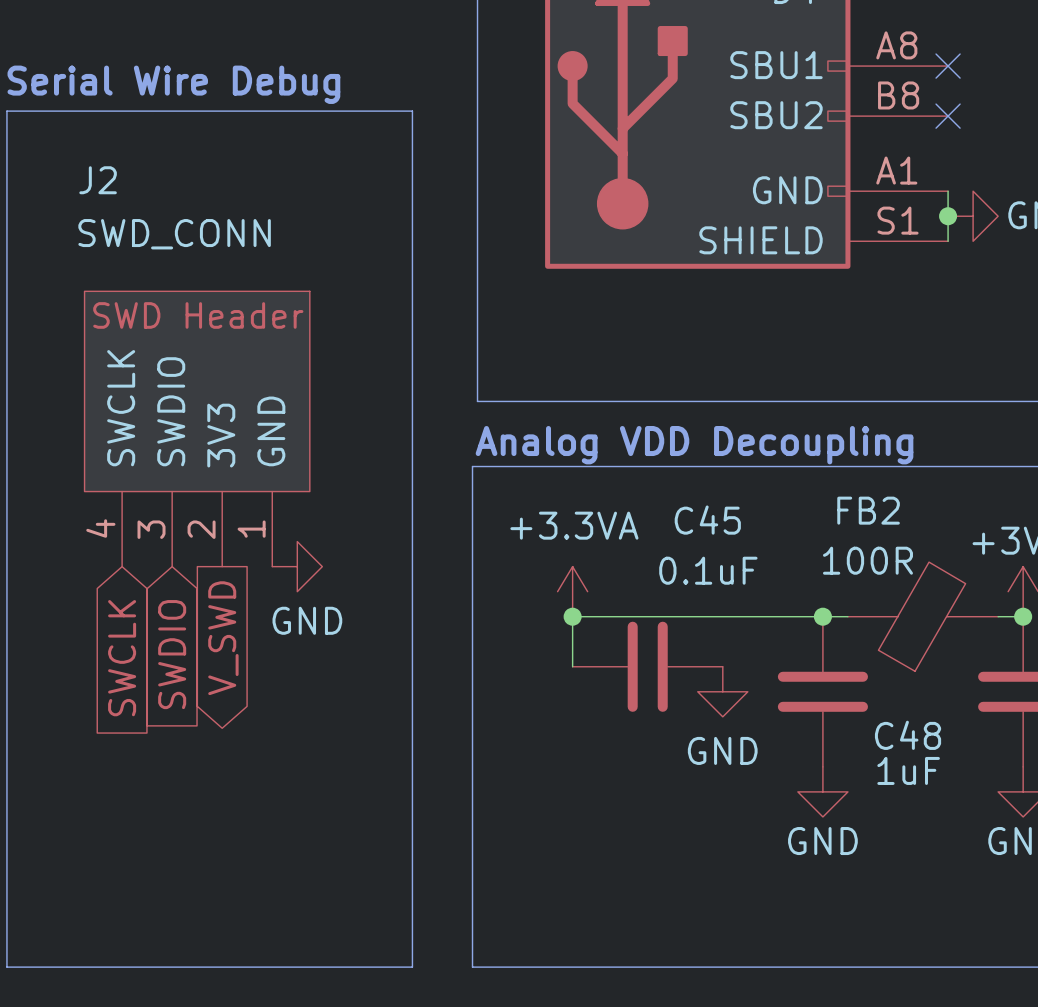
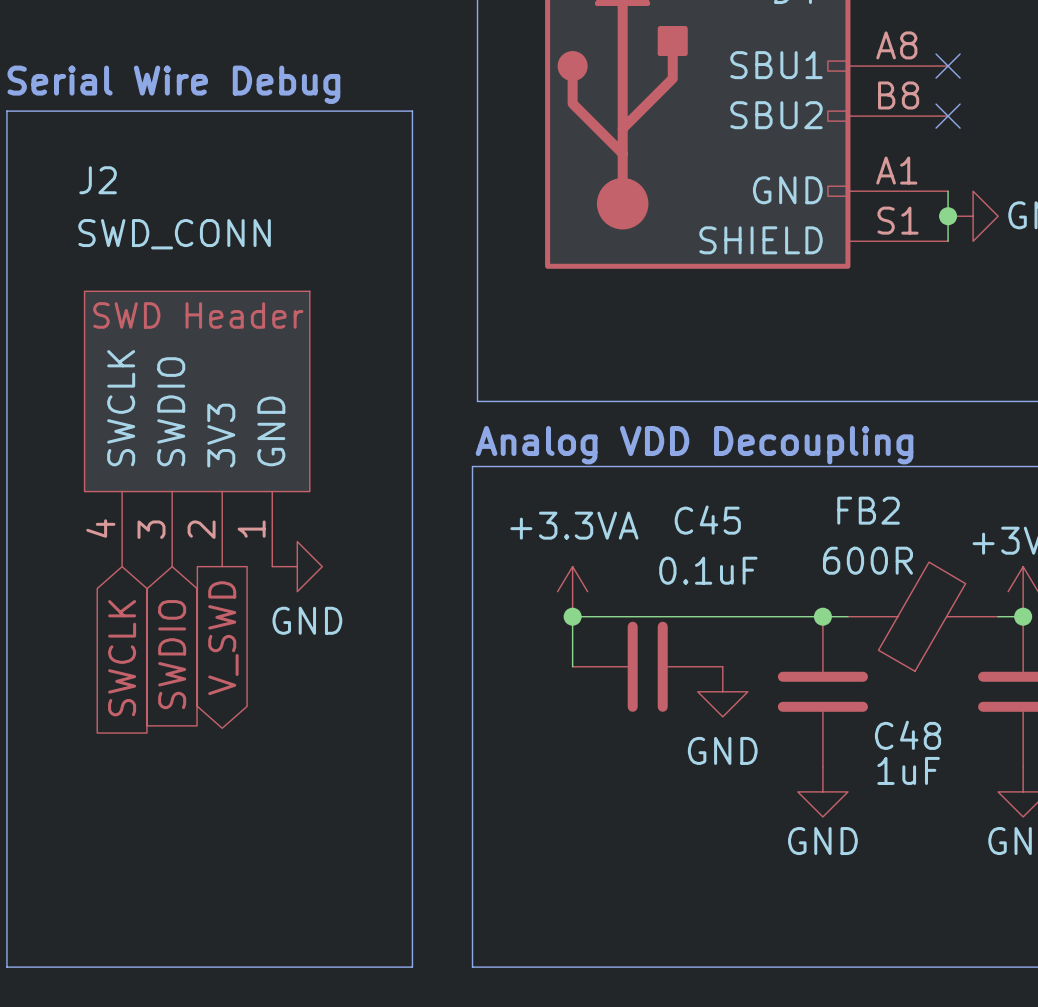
FB2 value: 100R (867, 560) -> 600R (867, 560)

